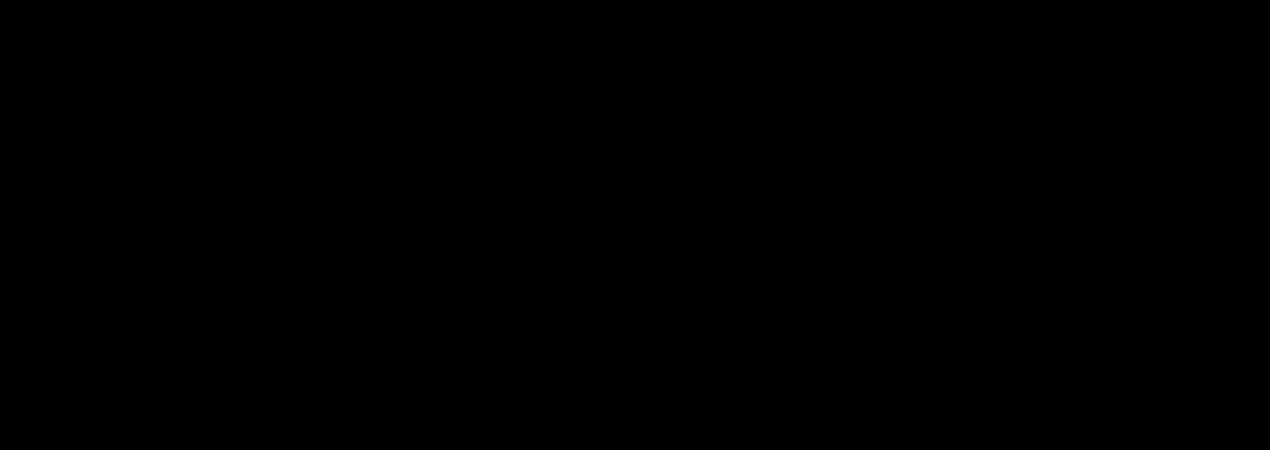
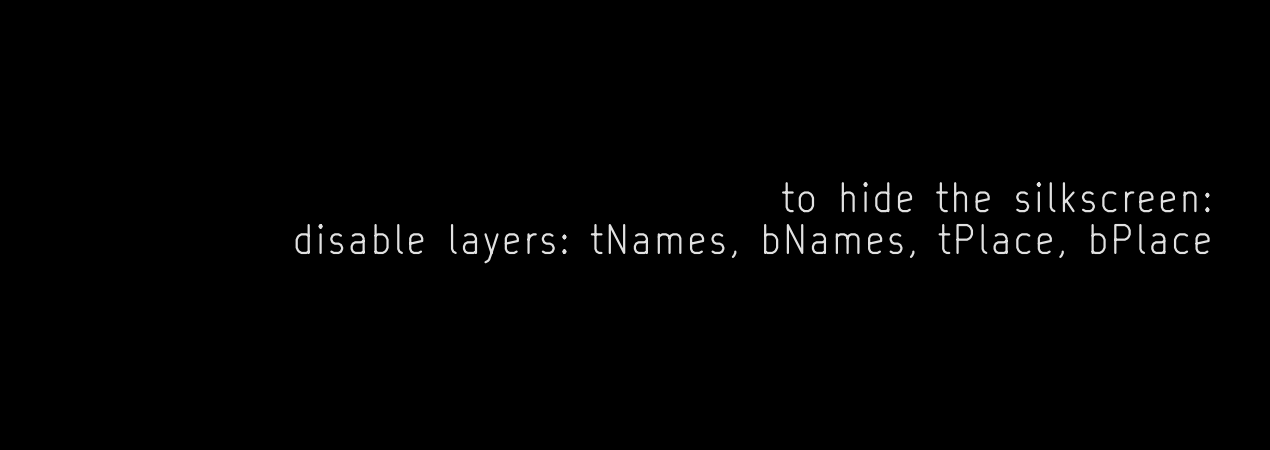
text: none -> to hide the silkscreen: (995, 197)
text: none -> disable layers: tNames, bNames, tPlace, bPlace (752, 243)

